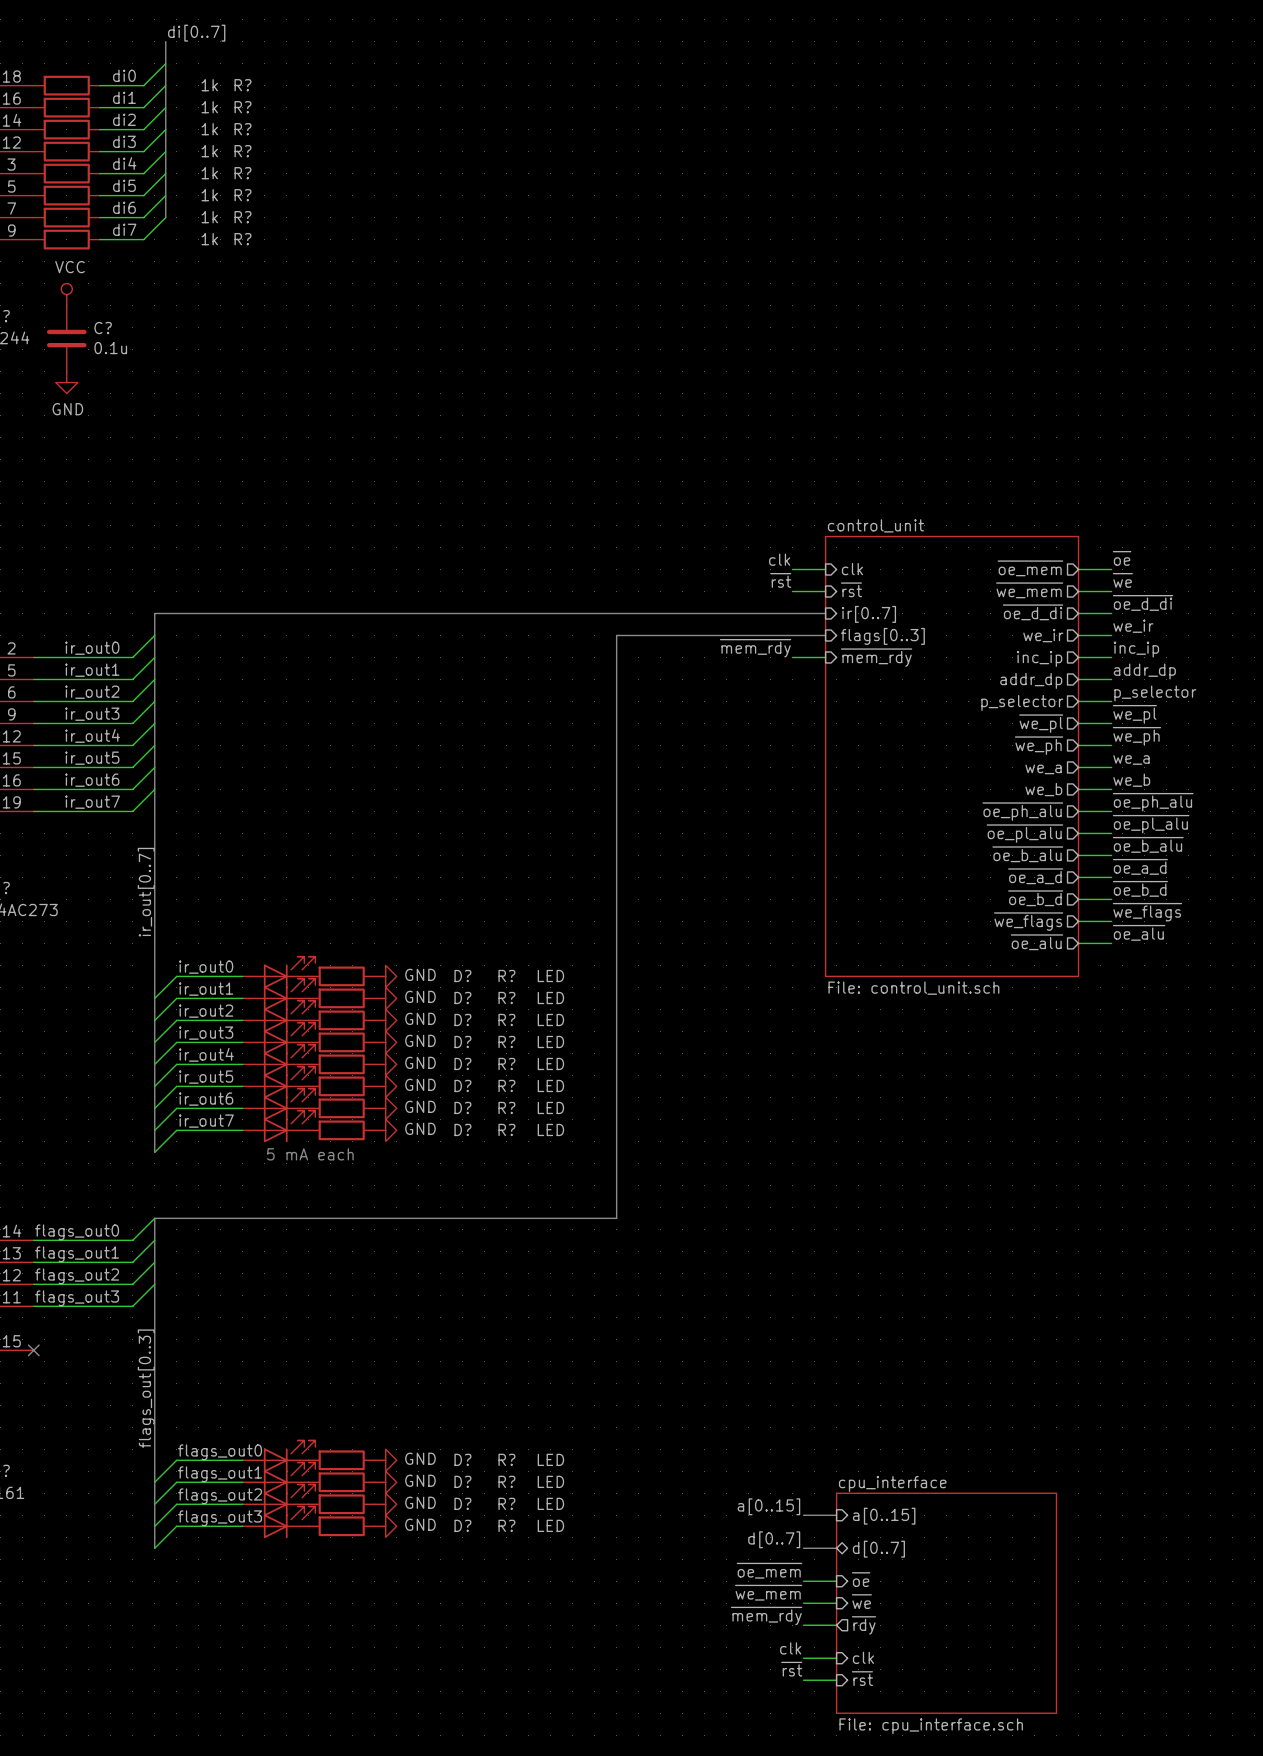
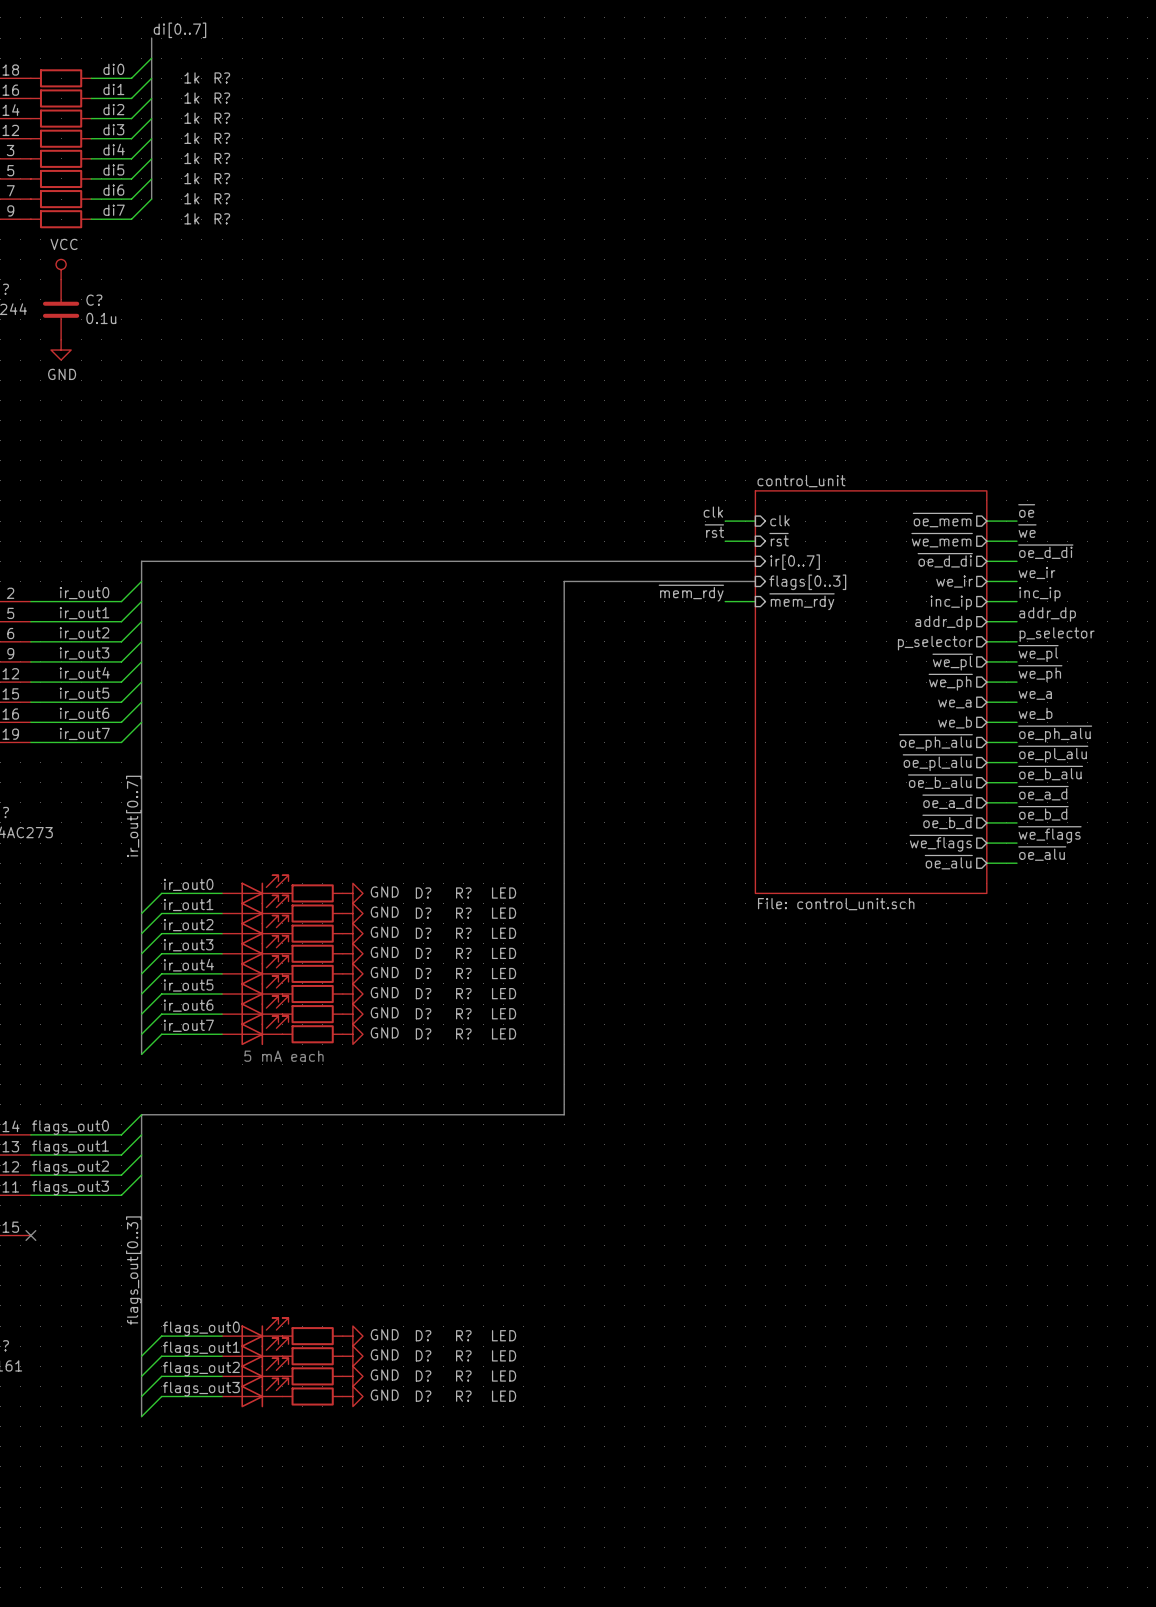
label: a[0..15] (768, 1506) -> none
bus: (803, 1515) (836, 1515) -> none
sheet pin: a[0..15] (884, 1516) -> none
label: d[0..7] (774, 1539) -> none
bus: (803, 1548) (836, 1548) -> none
sheet pin: d[0..7] (878, 1549) -> none
label: ~{oe_mem} (769, 1570) -> none
sheet pin: ~{oe} (861, 1579) -> none
wire: (803, 1581) (836, 1581) -> none
label: ~{we_mem} (768, 1592) -> none
sheet pin: ~{we} (861, 1601) -> none
wire: (803, 1603) (836, 1603) -> none
sheet cpu_interface: File: cpu_interface.sch (946, 1603) -> none
label: ~{mem_rdy} (766, 1616) -> none
wire: (803, 1625) (836, 1625) -> none
sheet pin: ~{rdy} (863, 1625) -> none
label: clk (790, 1648) -> none
sheet pin: clk (863, 1657) -> none
wire: (803, 1658) (836, 1658) -> none
label: ~{rst} (791, 1669) -> none
sheet pin: ~{rst} (862, 1678) -> none
wire: (803, 1680) (836, 1680) -> none

